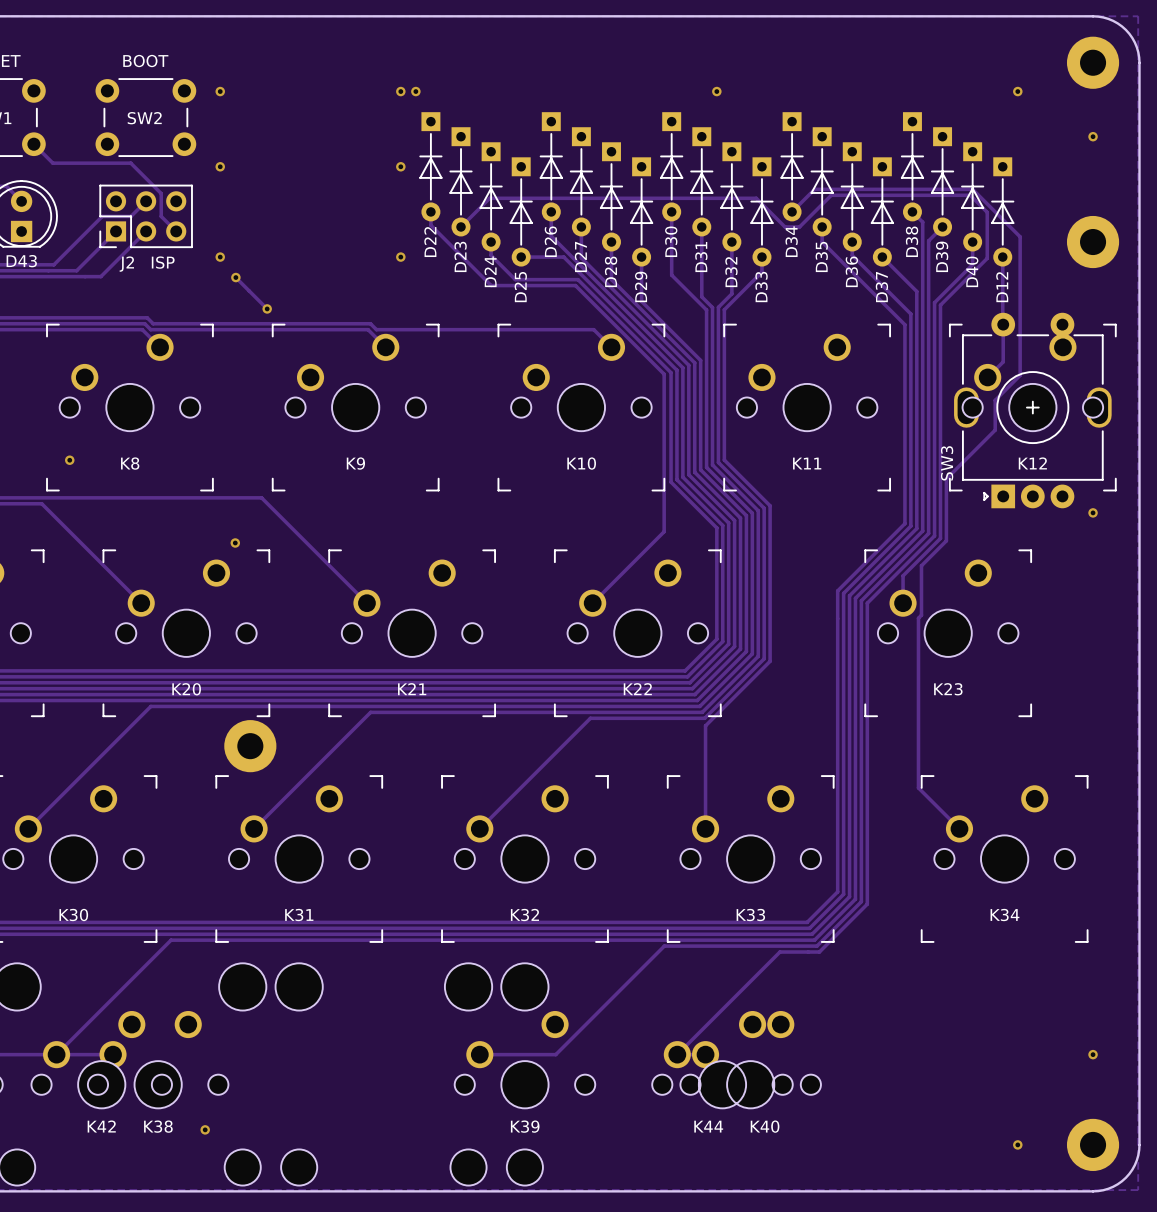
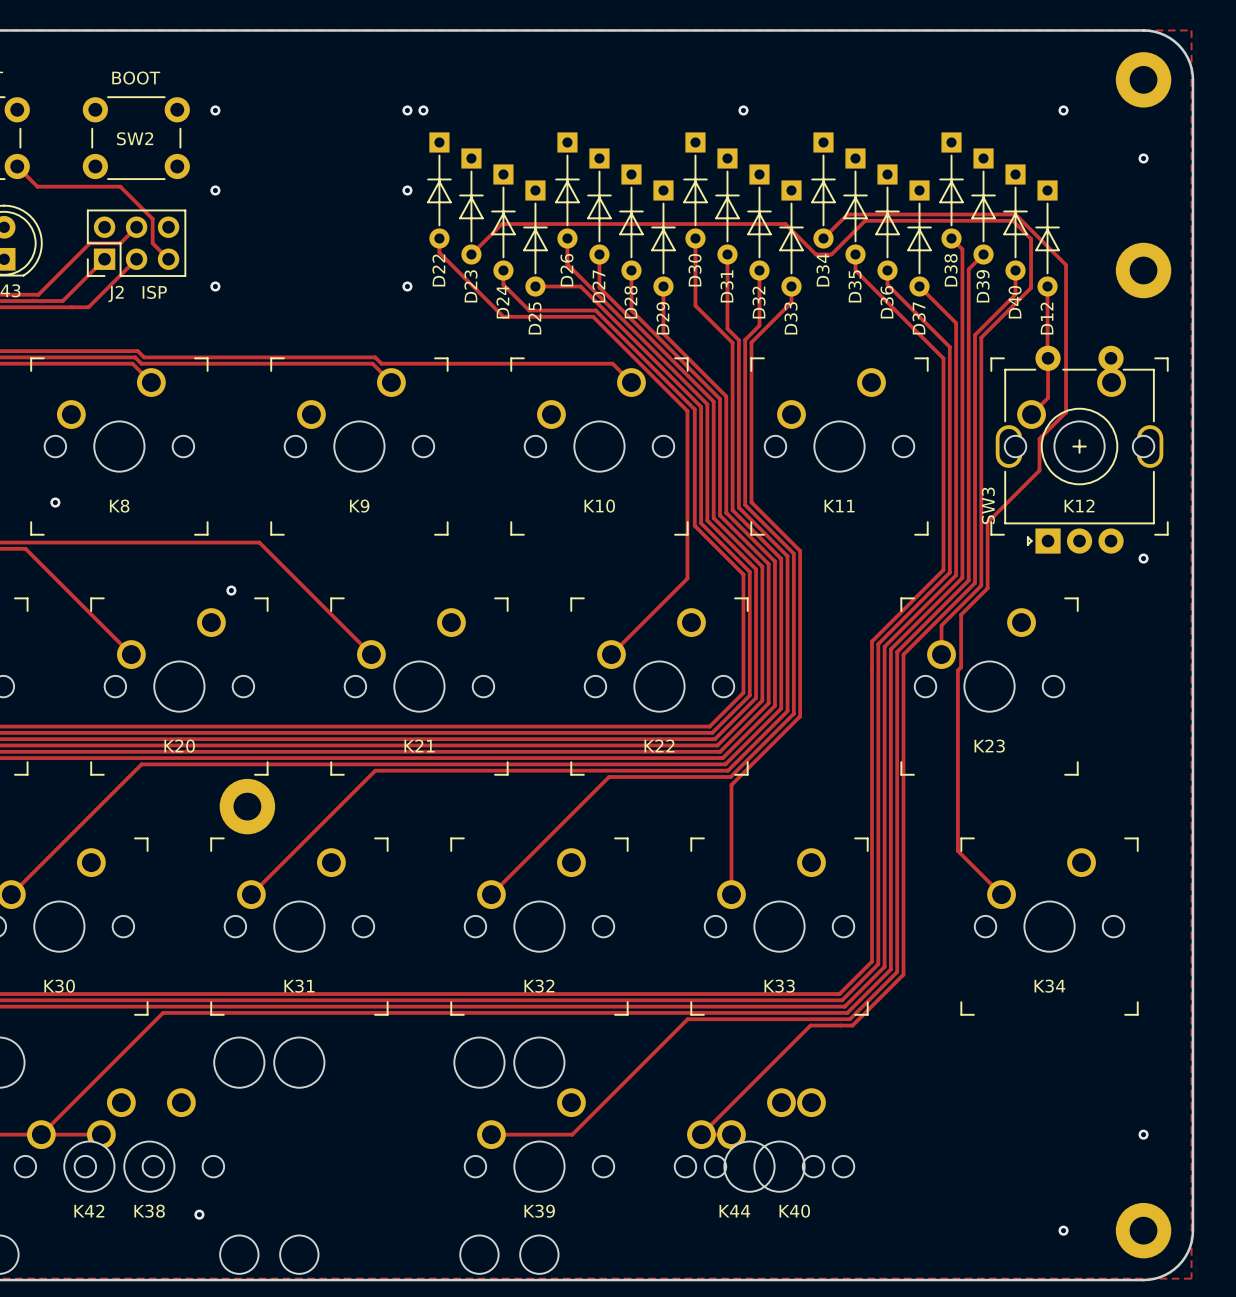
track: (235, 277) (267, 308) -> none
via: (235, 277) -> none
via: (267, 308) -> none

